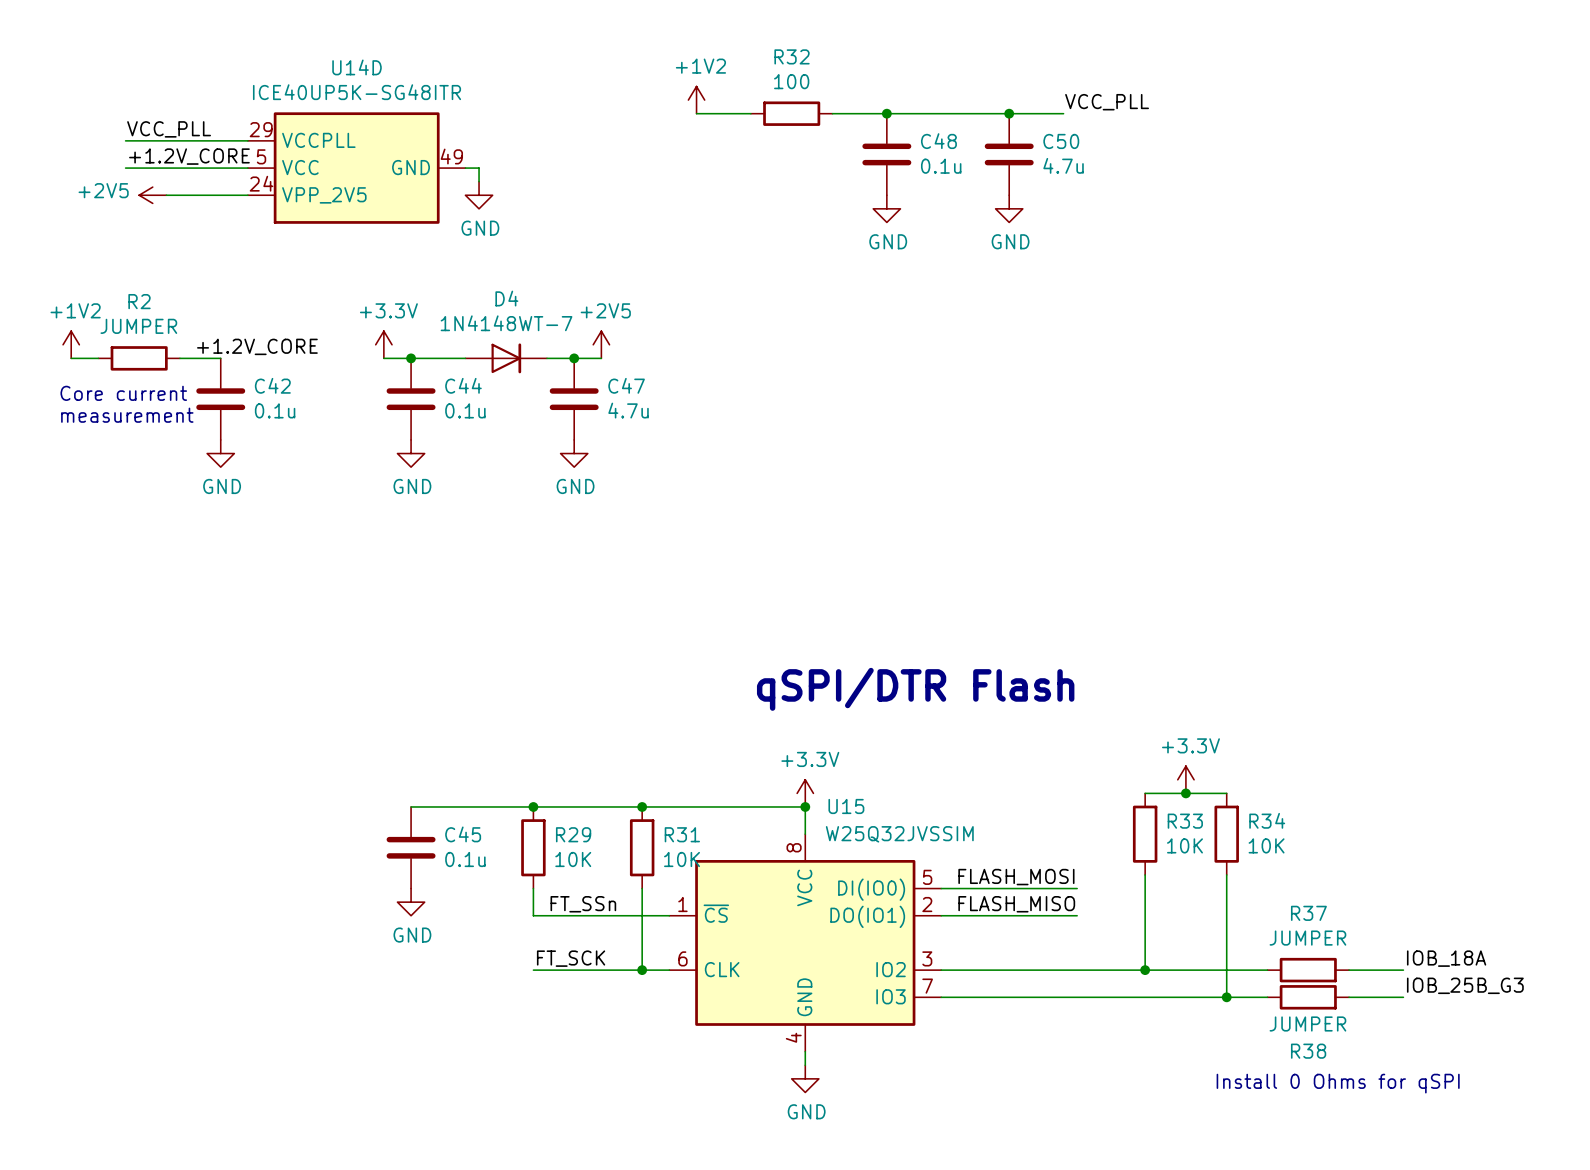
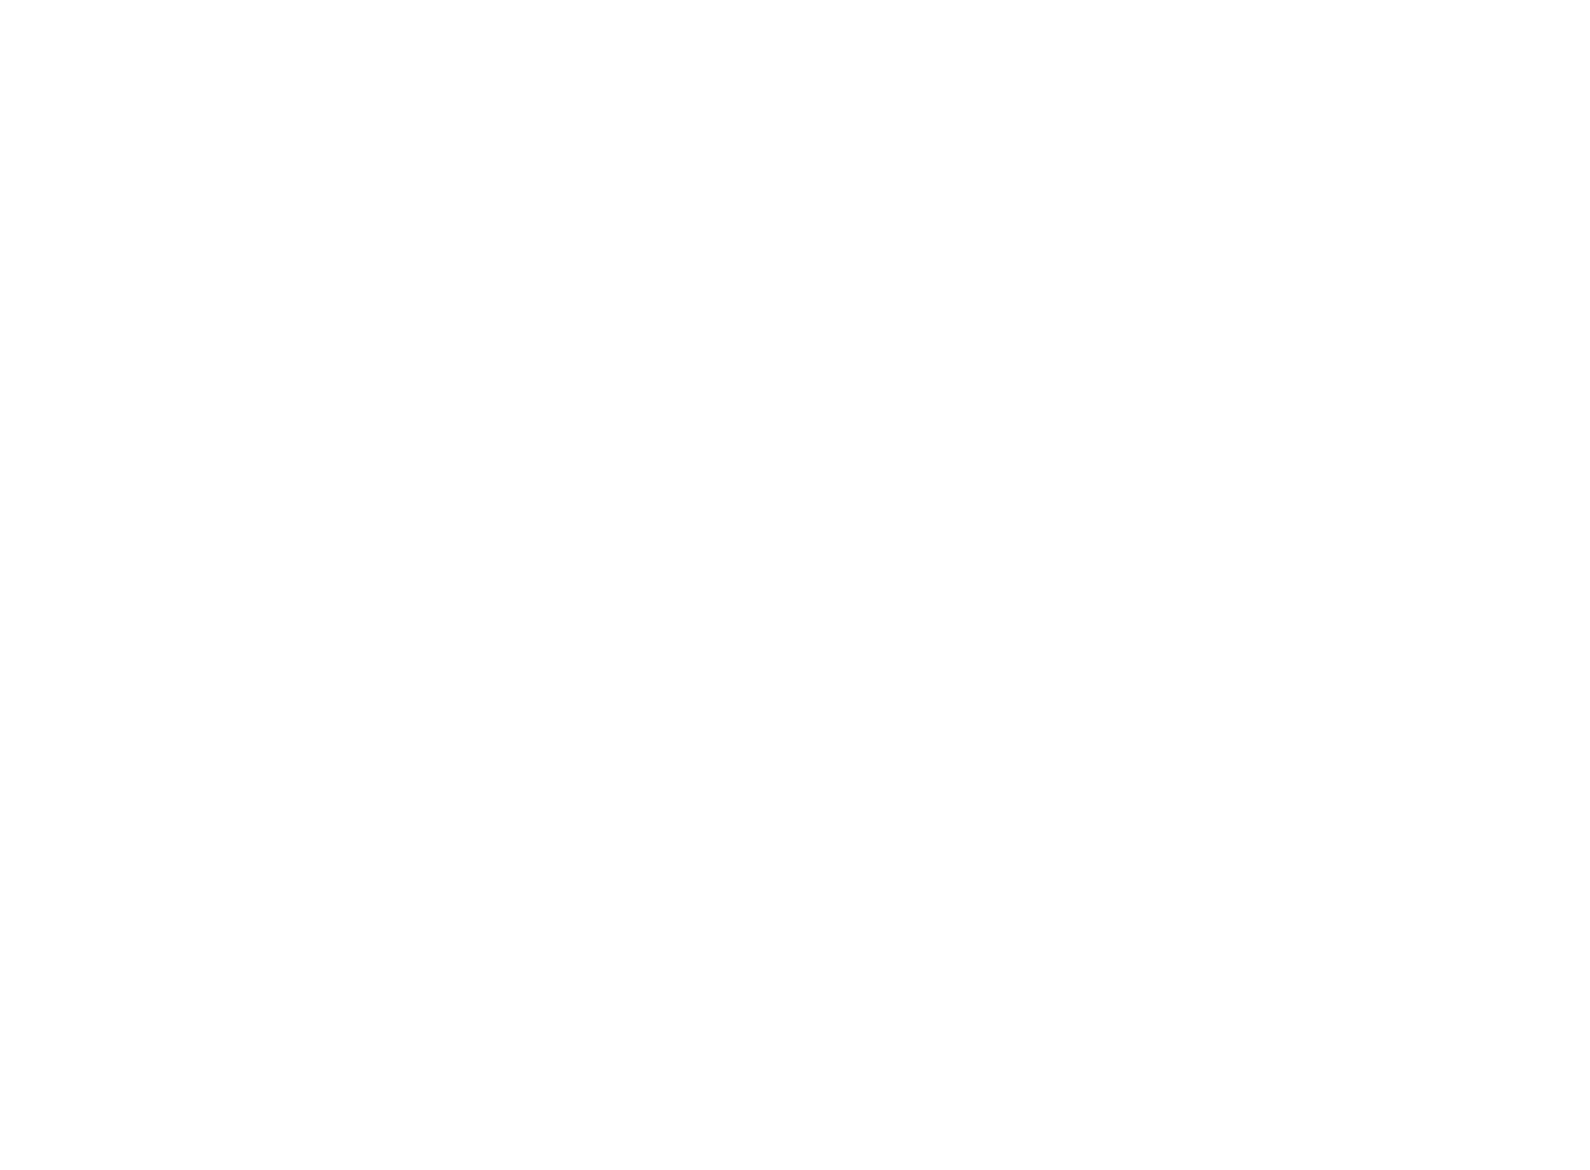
power symbol: +1V2 (696, 100) -> none
label: VCC_PLL (1107, 102) -> none
wire: (696, 113) (750, 113) -> none
R32: 100 (791, 113) -> none
wire: (832, 113) (1063, 113) -> none
junction: (886, 113) -> none
junction: (1009, 113) -> none
label: VCC_PLL (169, 129) -> none
wire: (125, 140) (247, 140) -> none
C48: 0.1u (886, 154) -> none
C50: 4.7u (1009, 154) -> none
label: +1.2V_CORE (189, 156) -> none
wire: (125, 168) (247, 168) -> none
U14D: ICE40UP5K-SG48ITR (356, 168) -> none
wire: (465, 168) (479, 168) (479, 181) -> none
power symbol: +2V5 (152, 195) -> none
wire: (166, 195) (247, 195) -> none
power symbol: GND (479, 195) -> none
power symbol: GND (886, 208) -> none
power symbol: GND (1009, 208) -> none
power symbol: +1V2 (71, 344) -> none
power symbol: +3.3V (383, 344) -> none
power symbol: +2V5 (601, 344) -> none
label: +1.2V_CORE (257, 346) -> none
wire: (71, 358) (98, 358) -> none
R2: JUMPER (139, 358) -> none
wire: (179, 358) (220, 358) -> none
wire: (383, 358) (465, 358) -> none
junction: (411, 358) -> none
D4: 1N4148WT-7 (506, 358) -> none
wire: (547, 358) (601, 358) -> none
junction: (574, 358) -> none
text: Core current (123, 393) -> none
C42: 0.1u (220, 399) -> none
C44: 0.1u (411, 399) -> none
C47: 4.7u (574, 399) -> none
text: measurement (127, 415) -> none
power symbol: GND (220, 453) -> none
power symbol: GND (411, 453) -> none
power symbol: GND (574, 453) -> none
text: qSPI/DTR Flash (915, 689) -> none
power symbol: +3.3V (1185, 779) -> none
power symbol: +3.3V (805, 793) -> none
wire: (1145, 793) (1226, 793) -> none
junction: (1185, 793) -> none
wire: (411, 806) (805, 806) (805, 834) -> none
junction: (533, 806) -> none
junction: (642, 806) -> none
junction: (805, 806) -> none
R33: 10K (1145, 834) -> none
R34: 10K (1226, 834) -> none
C45: 0.1u (411, 847) -> none
R29: 10K (533, 847) -> none
R31: 10K (642, 847) -> none
wire: (1145, 874) (1145, 970) -> none
wire: (1226, 874) (1226, 997) -> none
label: FLASH_MOSI (1016, 877) -> none
wire: (533, 888) (533, 915) (669, 915) -> none
wire: (642, 888) (642, 970) -> none
wire: (941, 888) (1077, 888) -> none
power symbol: GND (411, 902) -> none
label: FT_SSn (583, 904) -> none
label: FLASH_MISO (1016, 904) -> none
wire: (941, 915) (1077, 915) -> none
U15: W25Q32JVSSIM (805, 942) -> none
label: FT_SCK (571, 958) -> none
label: IOB_18A (1446, 958) -> none
wire: (533, 970) (669, 970) -> none
junction: (642, 970) -> none
wire: (941, 970) (1267, 970) -> none
junction: (1145, 970) -> none
R37: JUMPER (1308, 970) -> none
wire: (1349, 970) (1403, 970) -> none
label: IOB_25B_G3 (1465, 985) -> none
wire: (941, 997) (1267, 997) -> none
junction: (1226, 997) -> none
R38: JUMPER (1308, 997) -> none
wire: (1349, 997) (1403, 997) -> none
wire: (805, 1051) (805, 1065) -> none
power symbol: GND (805, 1078) -> none
text: Install 0 Ohms for qSPI (1338, 1083) -> none

